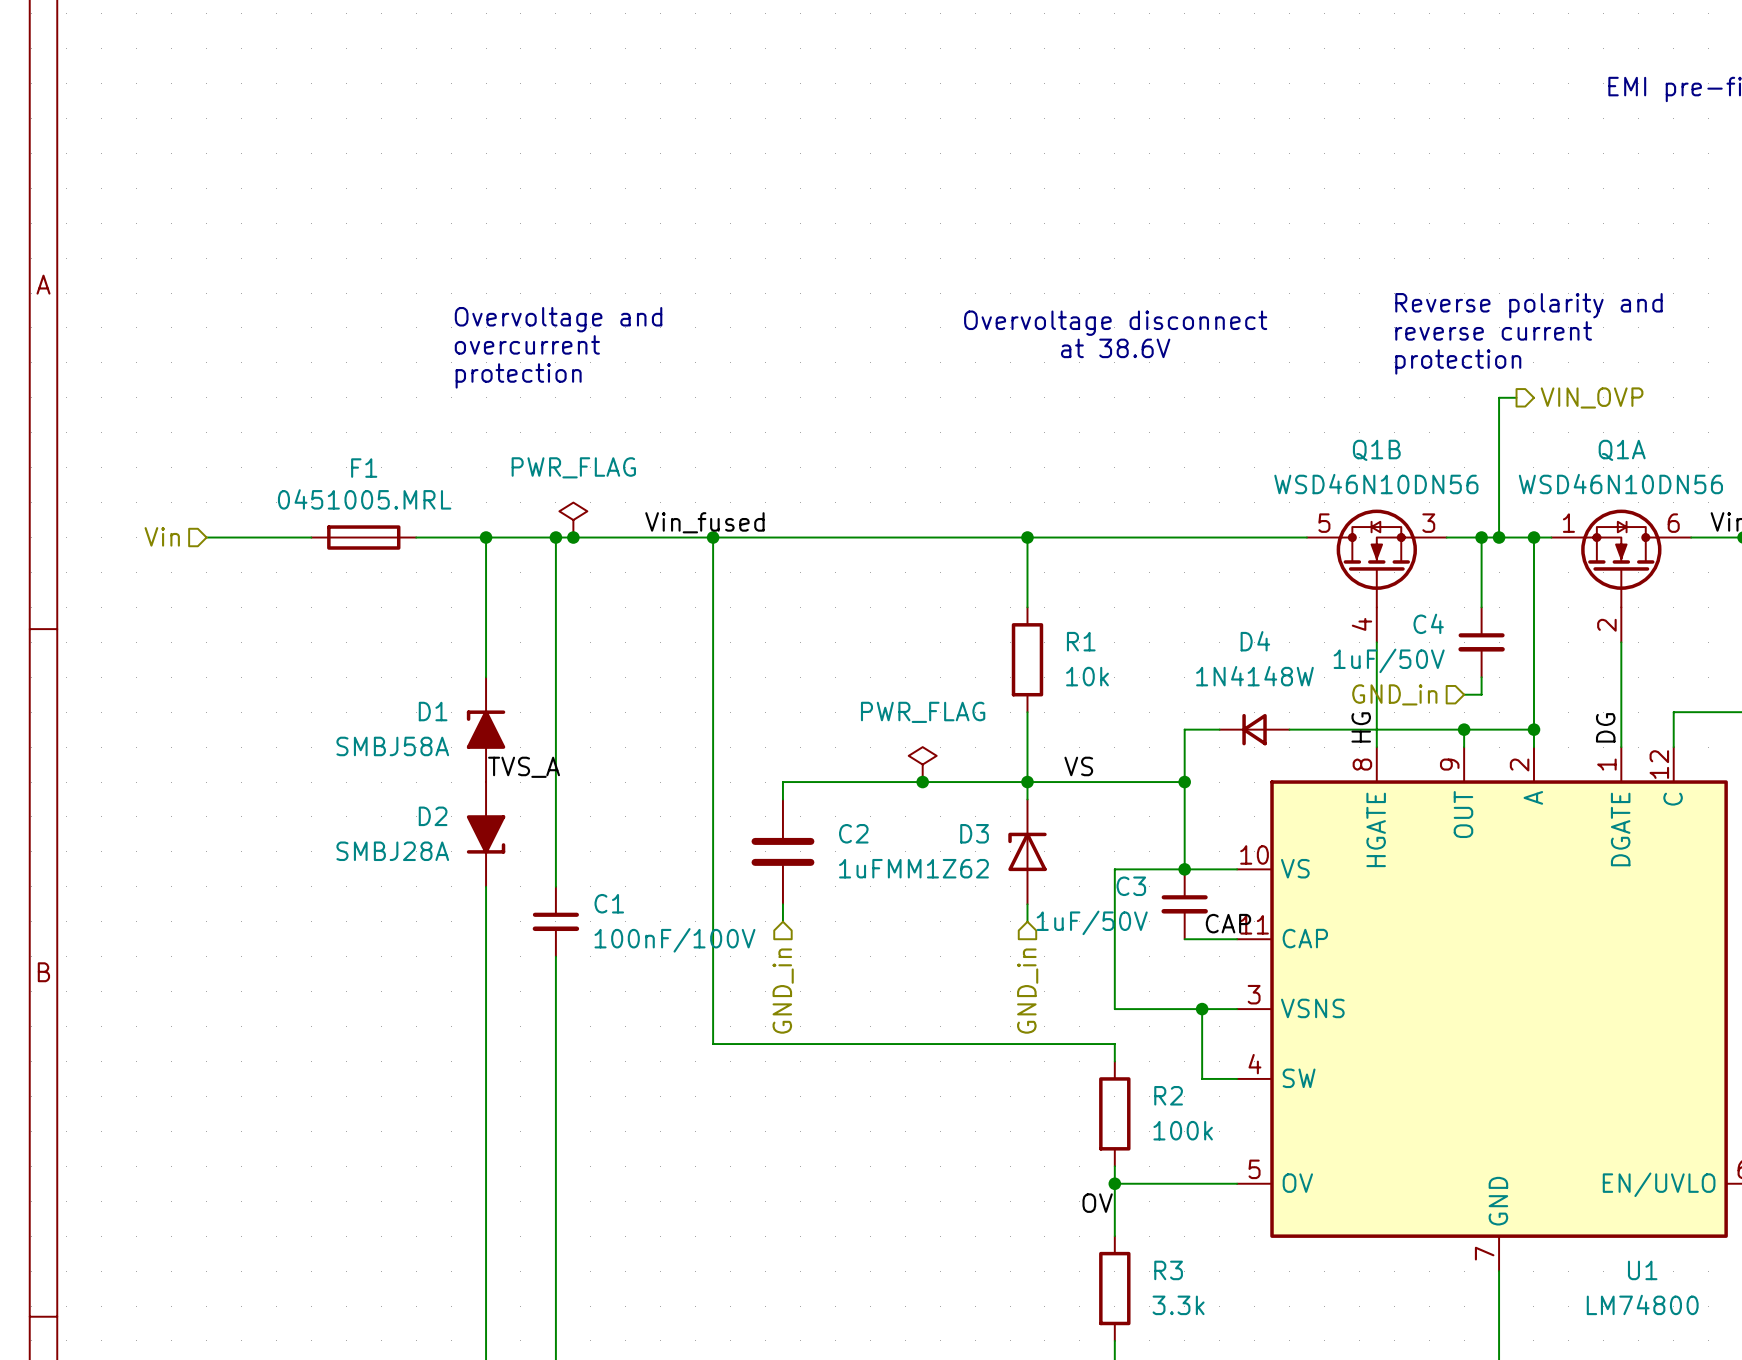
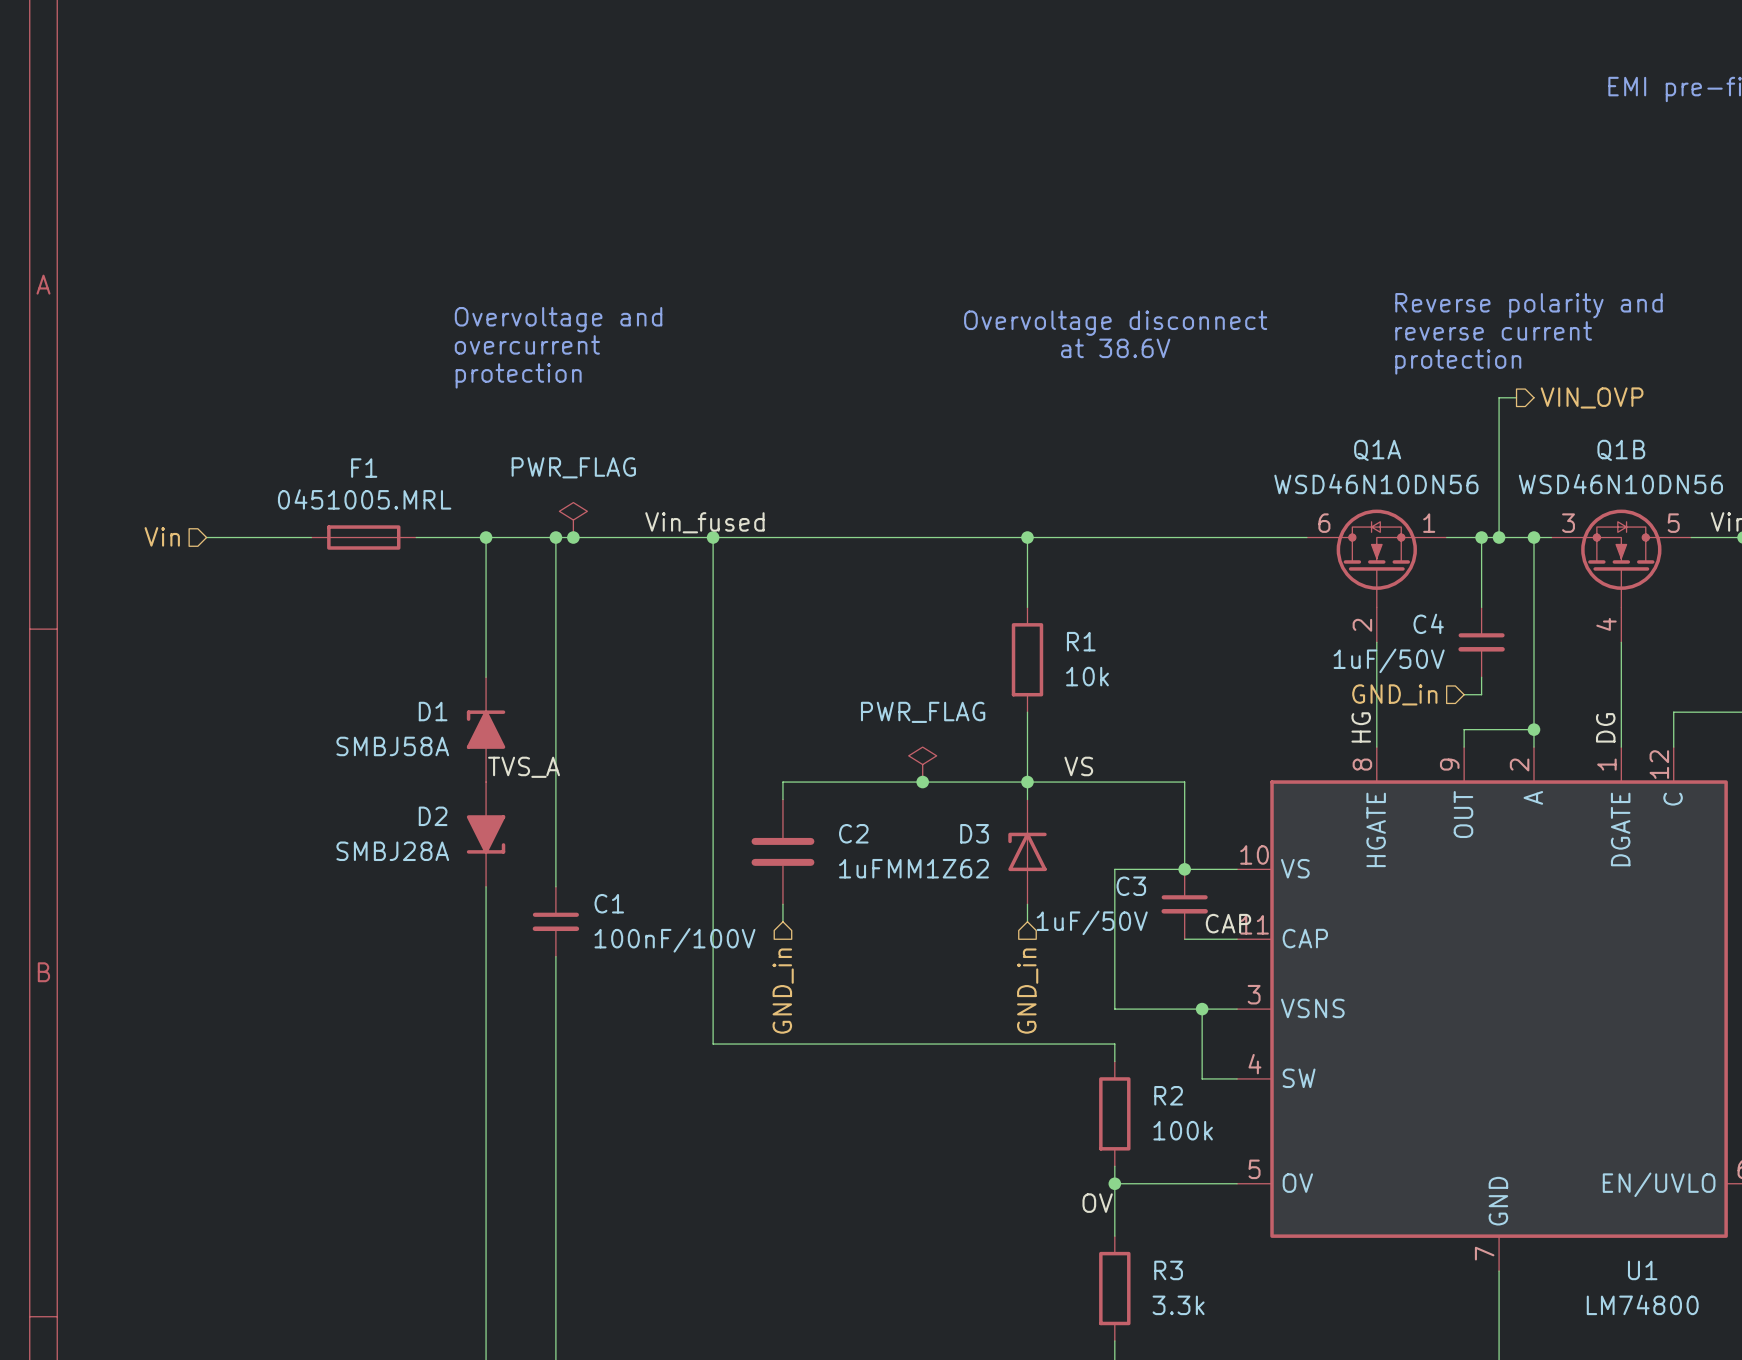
Q1B flip: as is (1376, 558) -> left-right (1621, 558)
Q1A flip: as is (1621, 558) -> left-right (1376, 558)
Q1B position: (1376, 575) -> (1621, 575)
Q1A position: (1621, 575) -> (1376, 575)
wire: (1219, 729) (1184, 729) (1184, 782) -> none
D4: 1N4148W (1254, 729) -> none
wire: (1289, 729) (1464, 729) -> none
junction: (1464, 729) -> none
junction: (1184, 782) -> none

